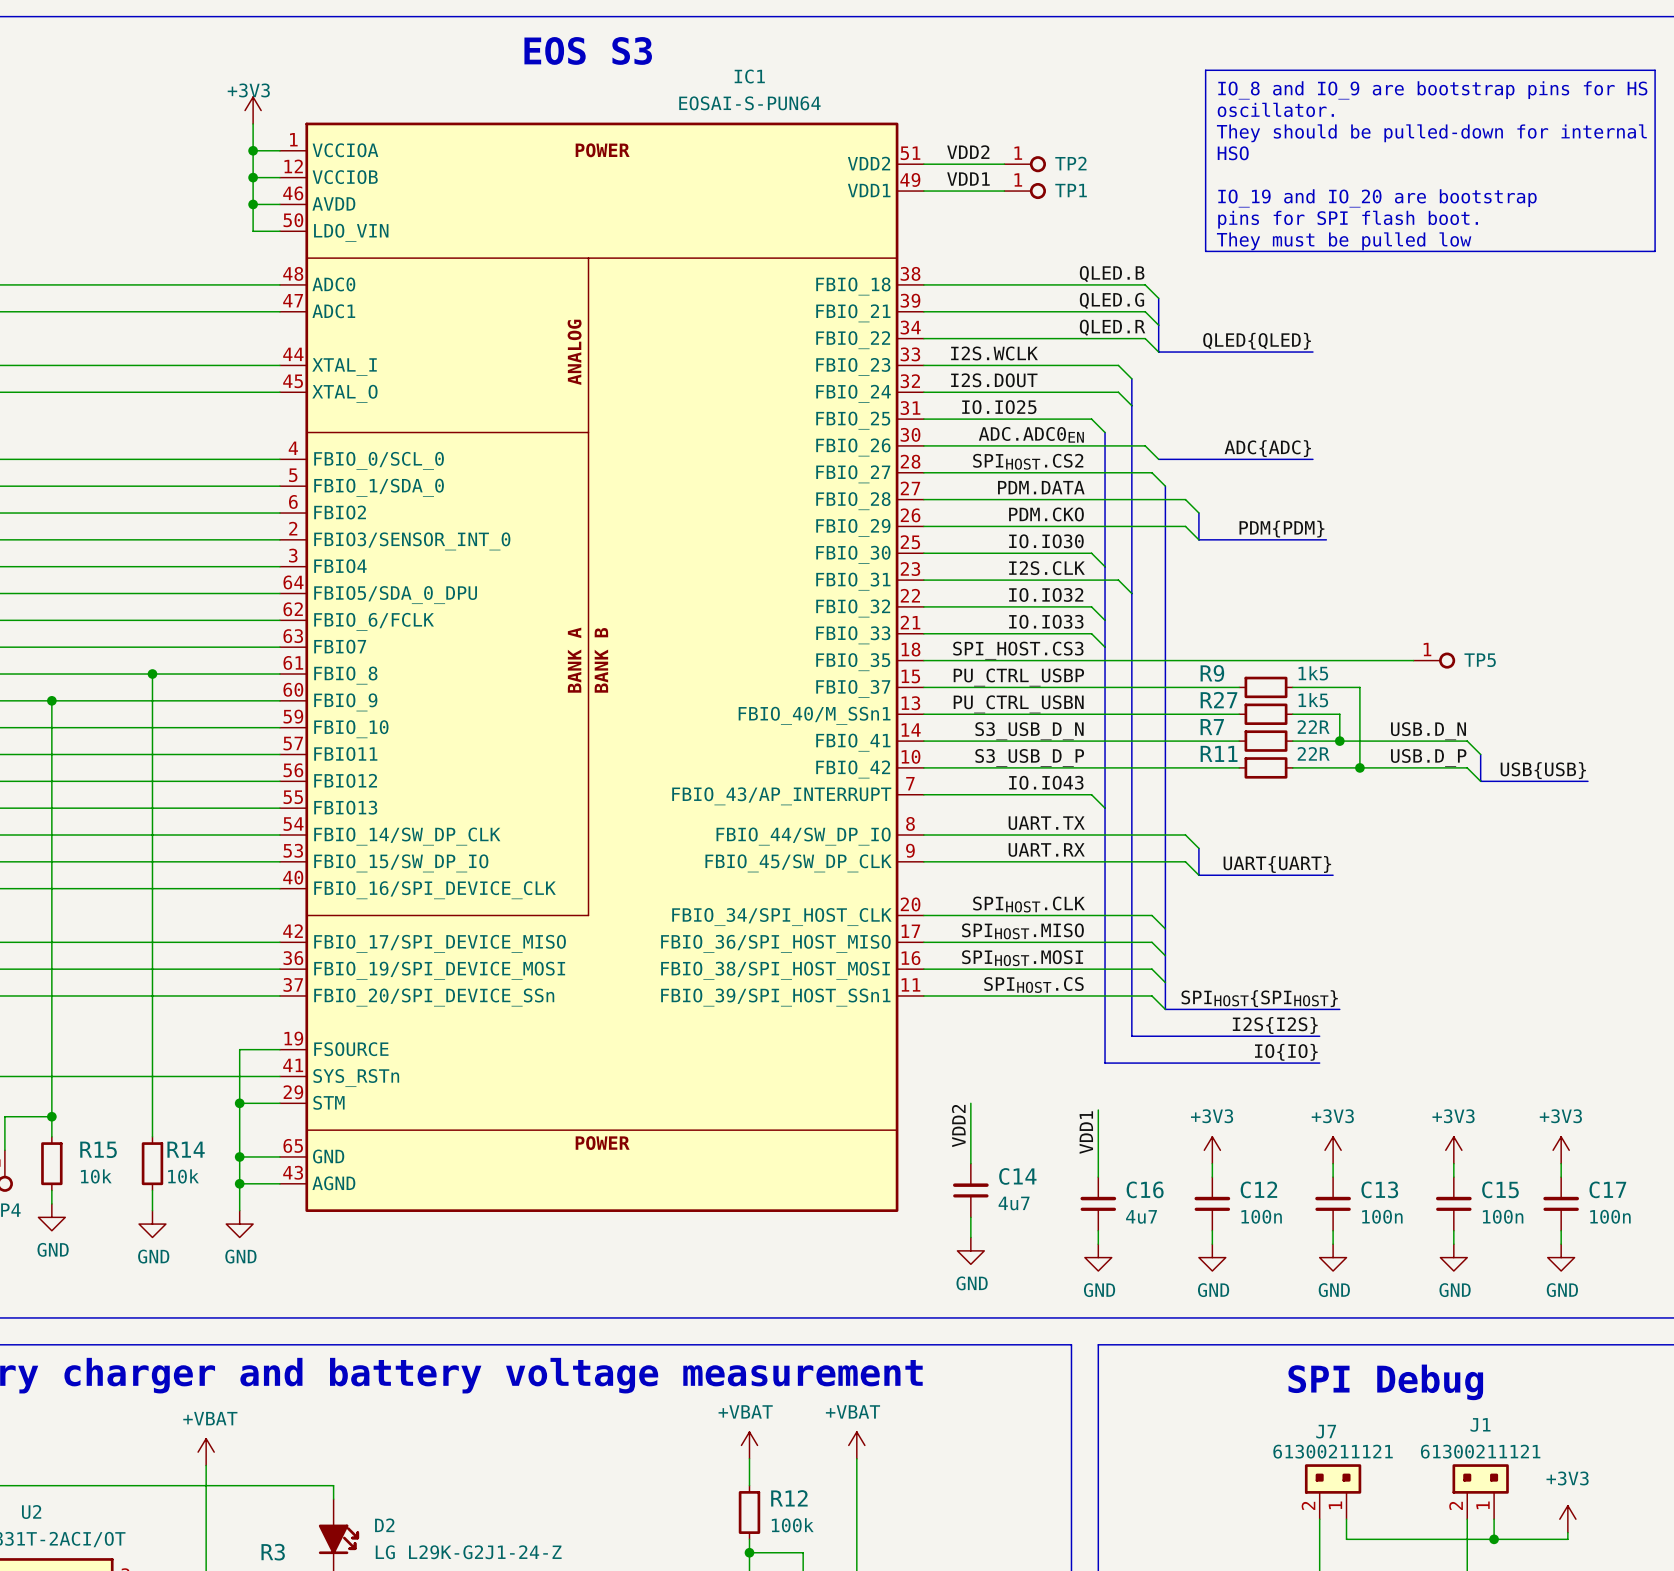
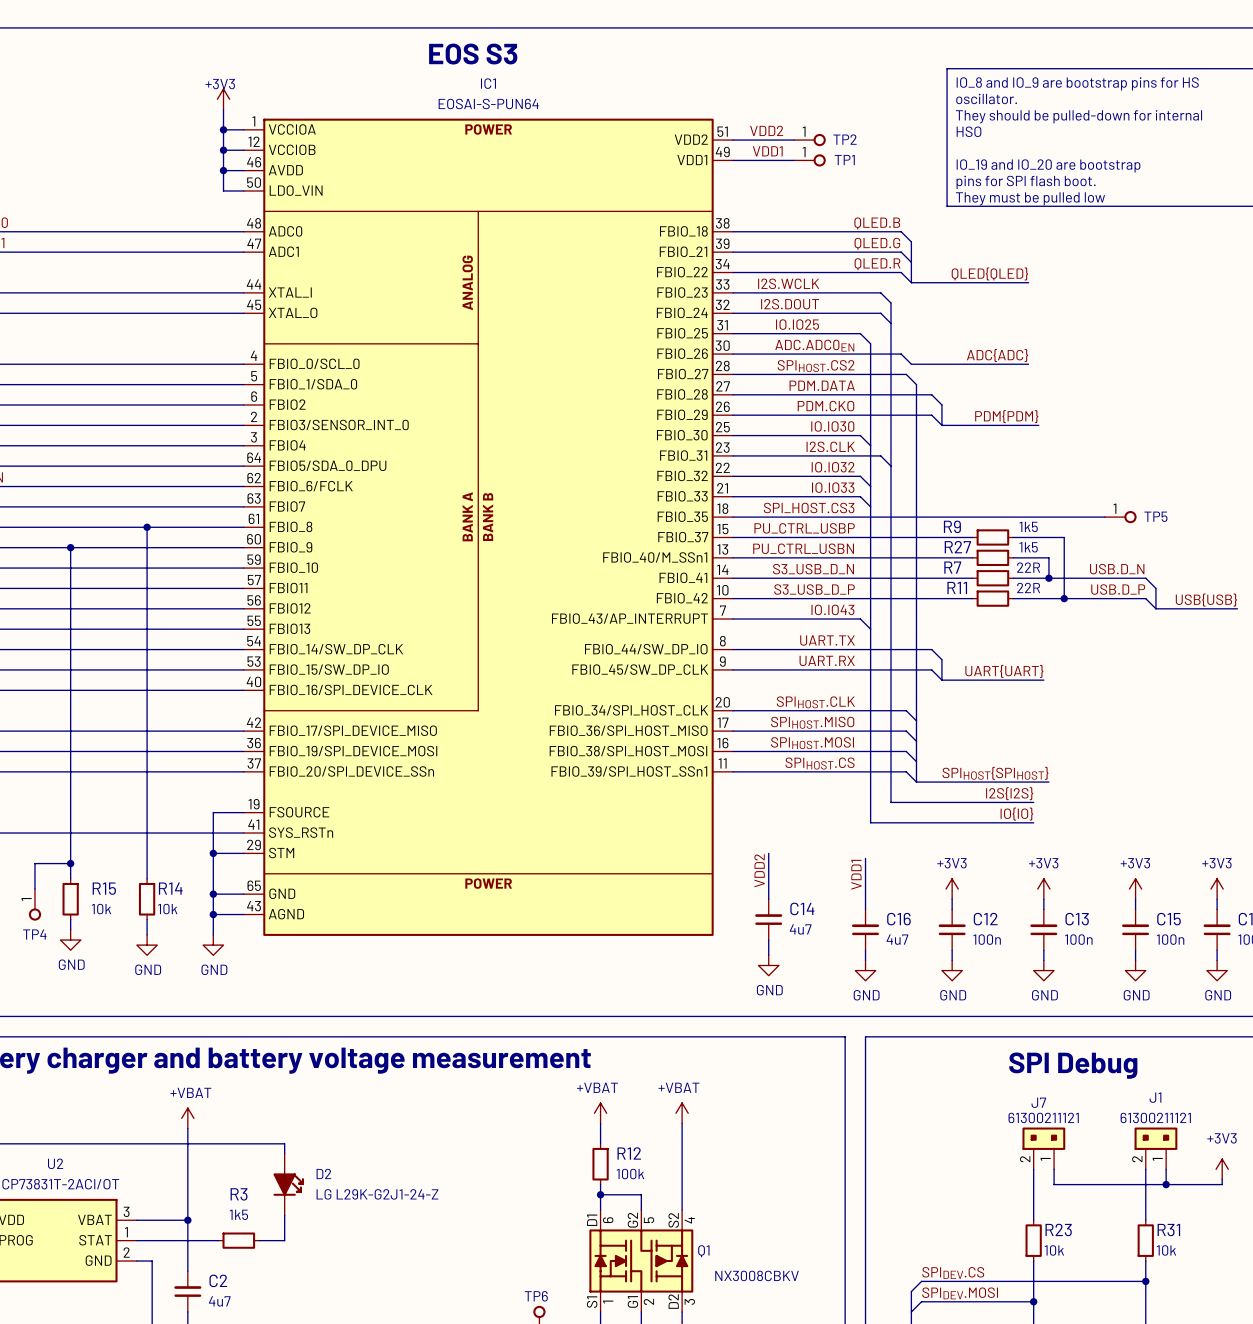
IC1 name position: IC1 (749, 76) -> IC1 (488, 83)
IC1 text position: EOSAI-S-PUN64 (749, 103) -> EOSAI-S-PUN64 (488, 103)
IC1 symbol: [279, 122, 924, 1212] -> [243, 118, 734, 936]

